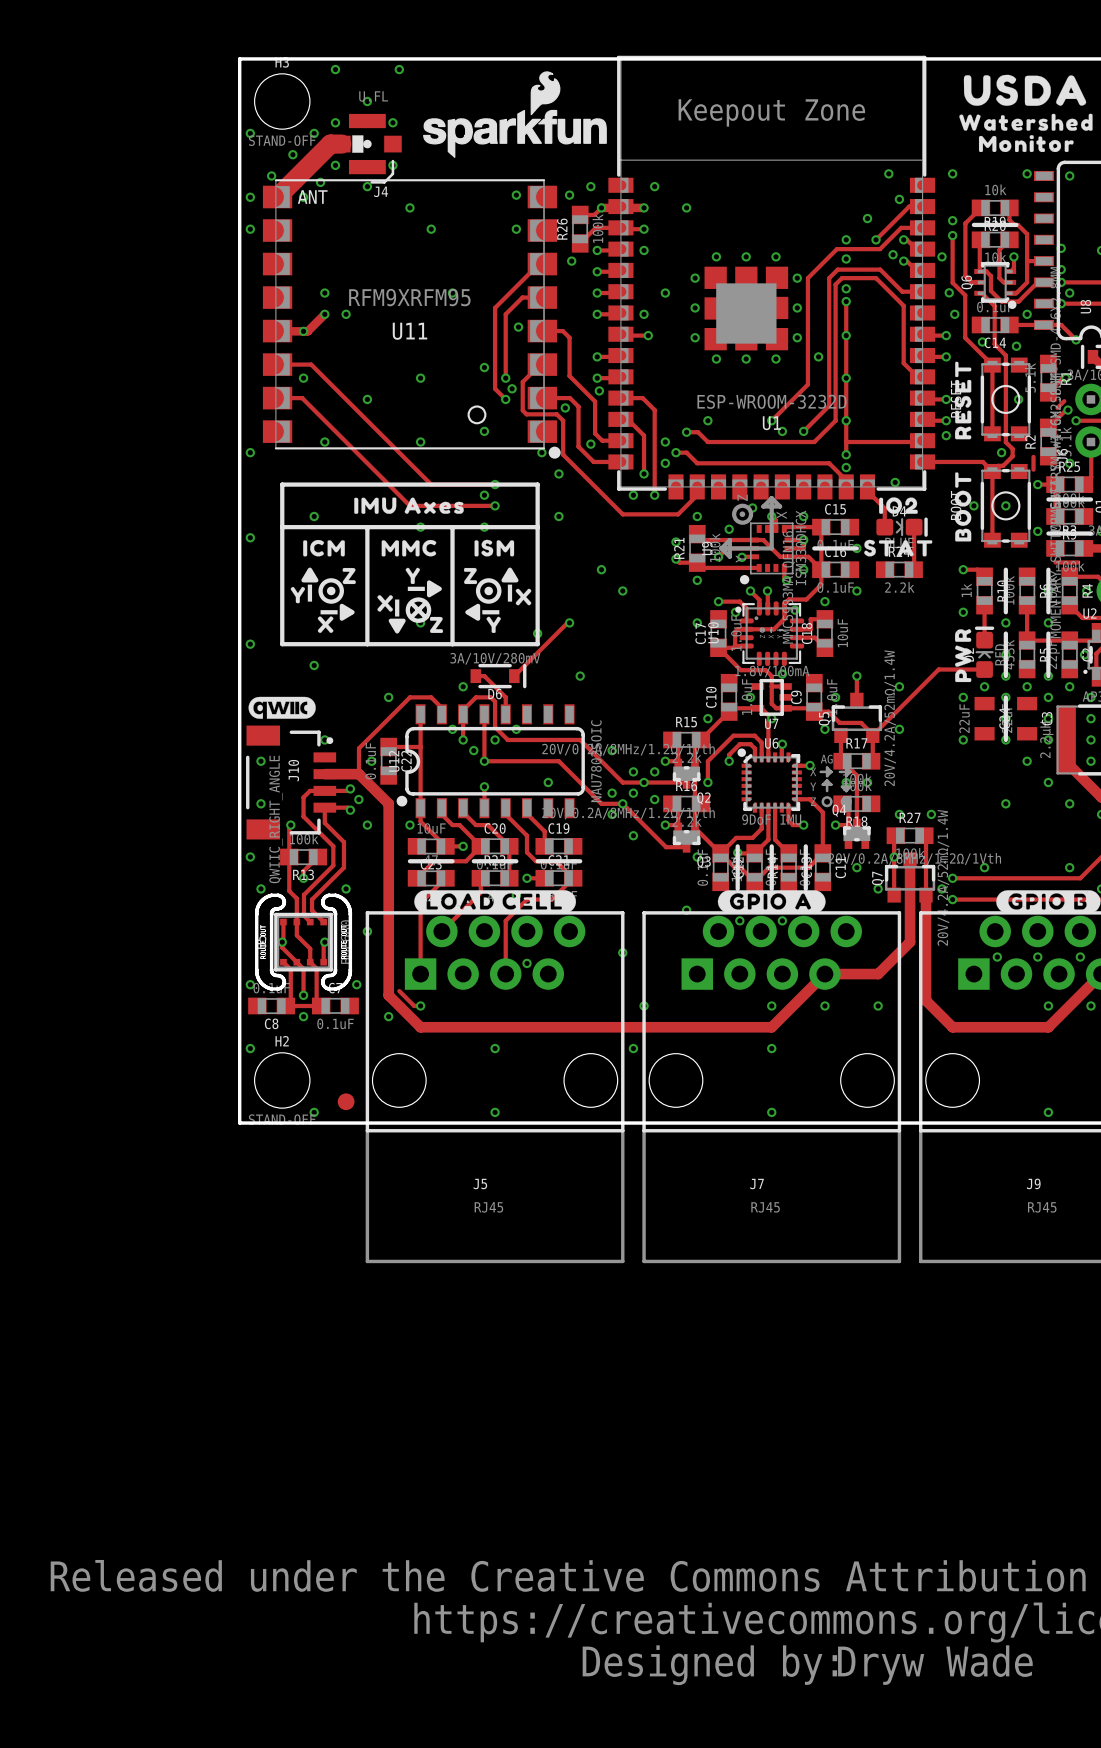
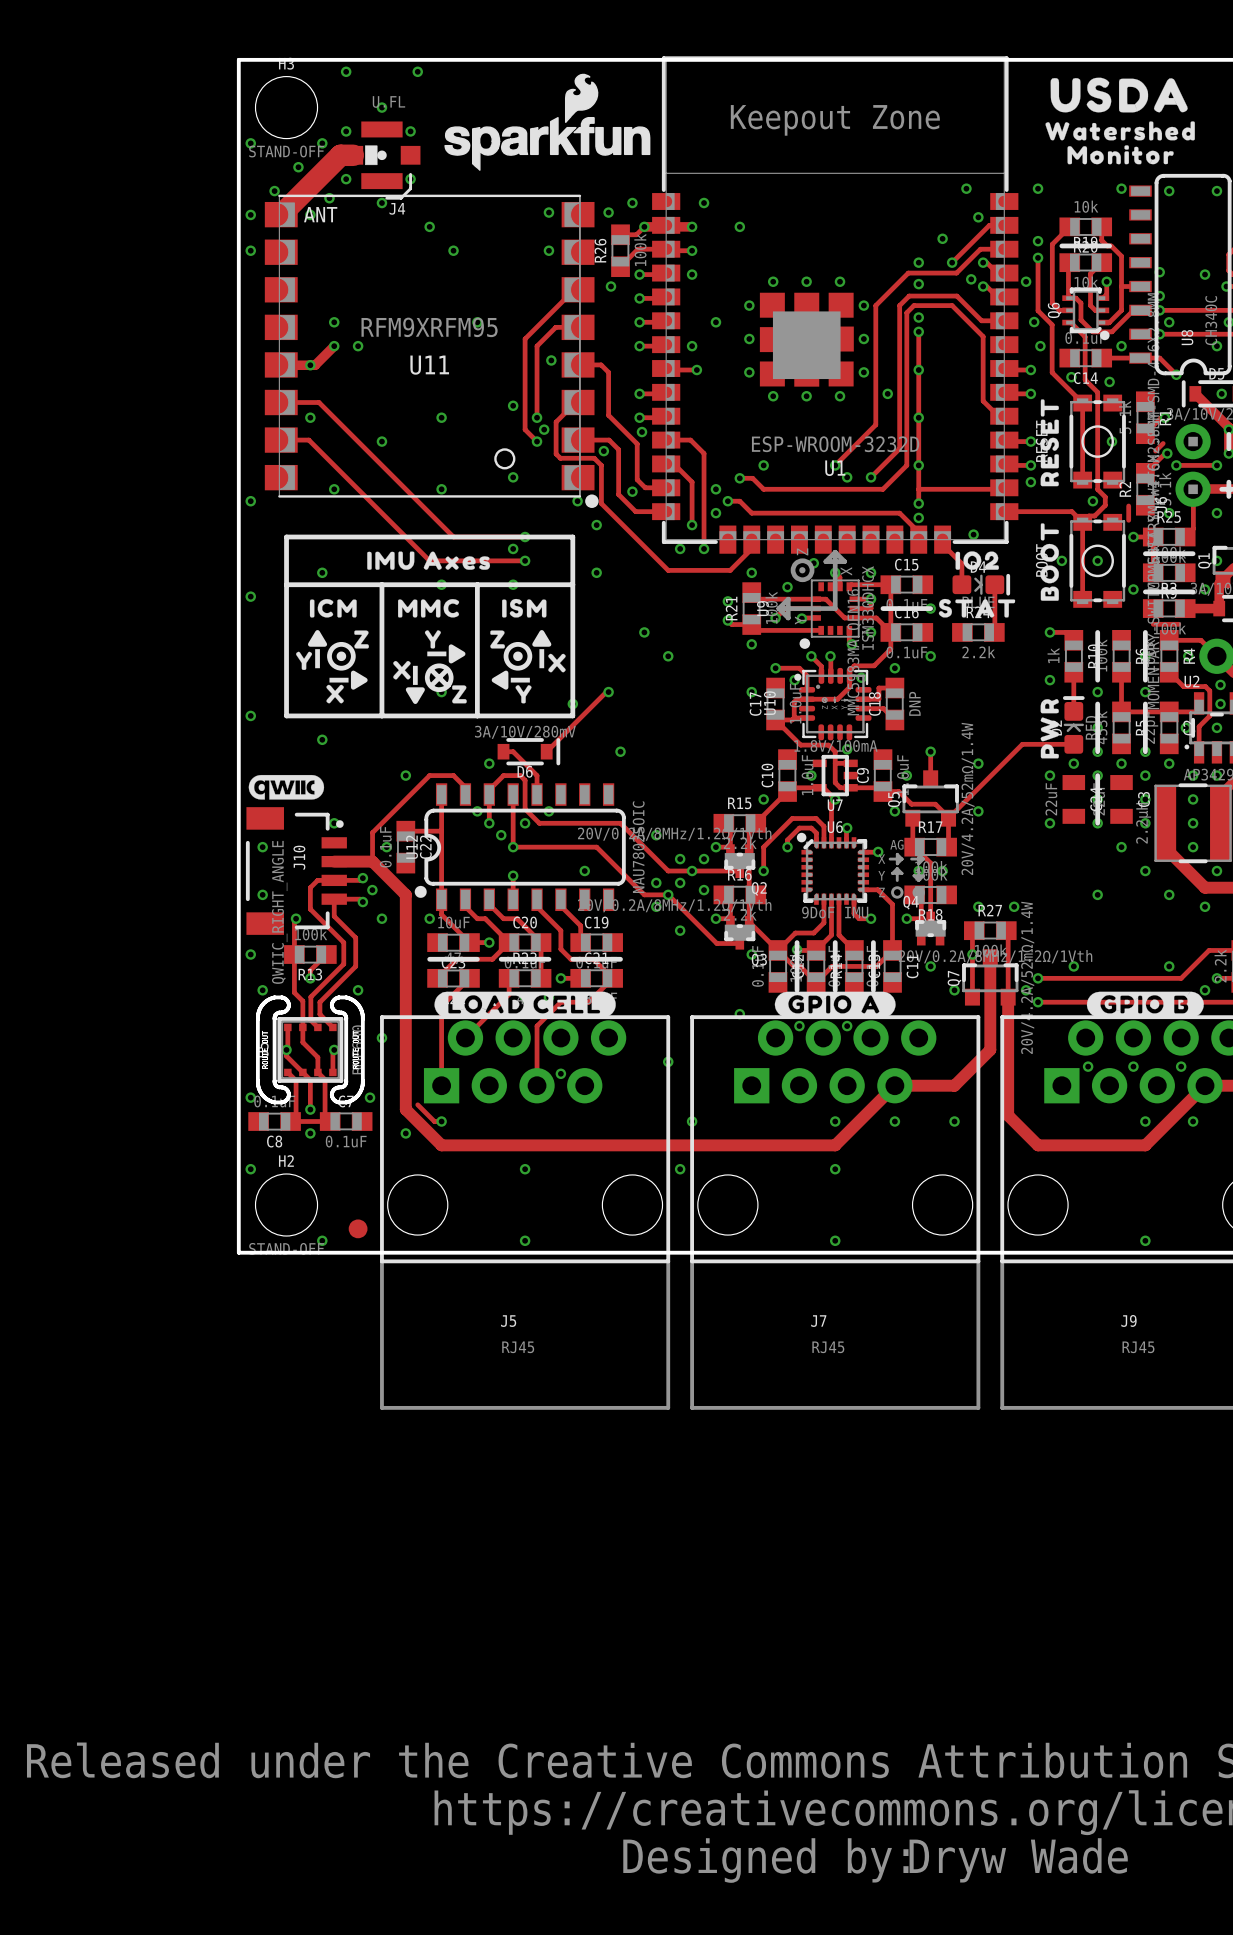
C18 value: 10uF (842, 633) -> DNP (914, 703)

